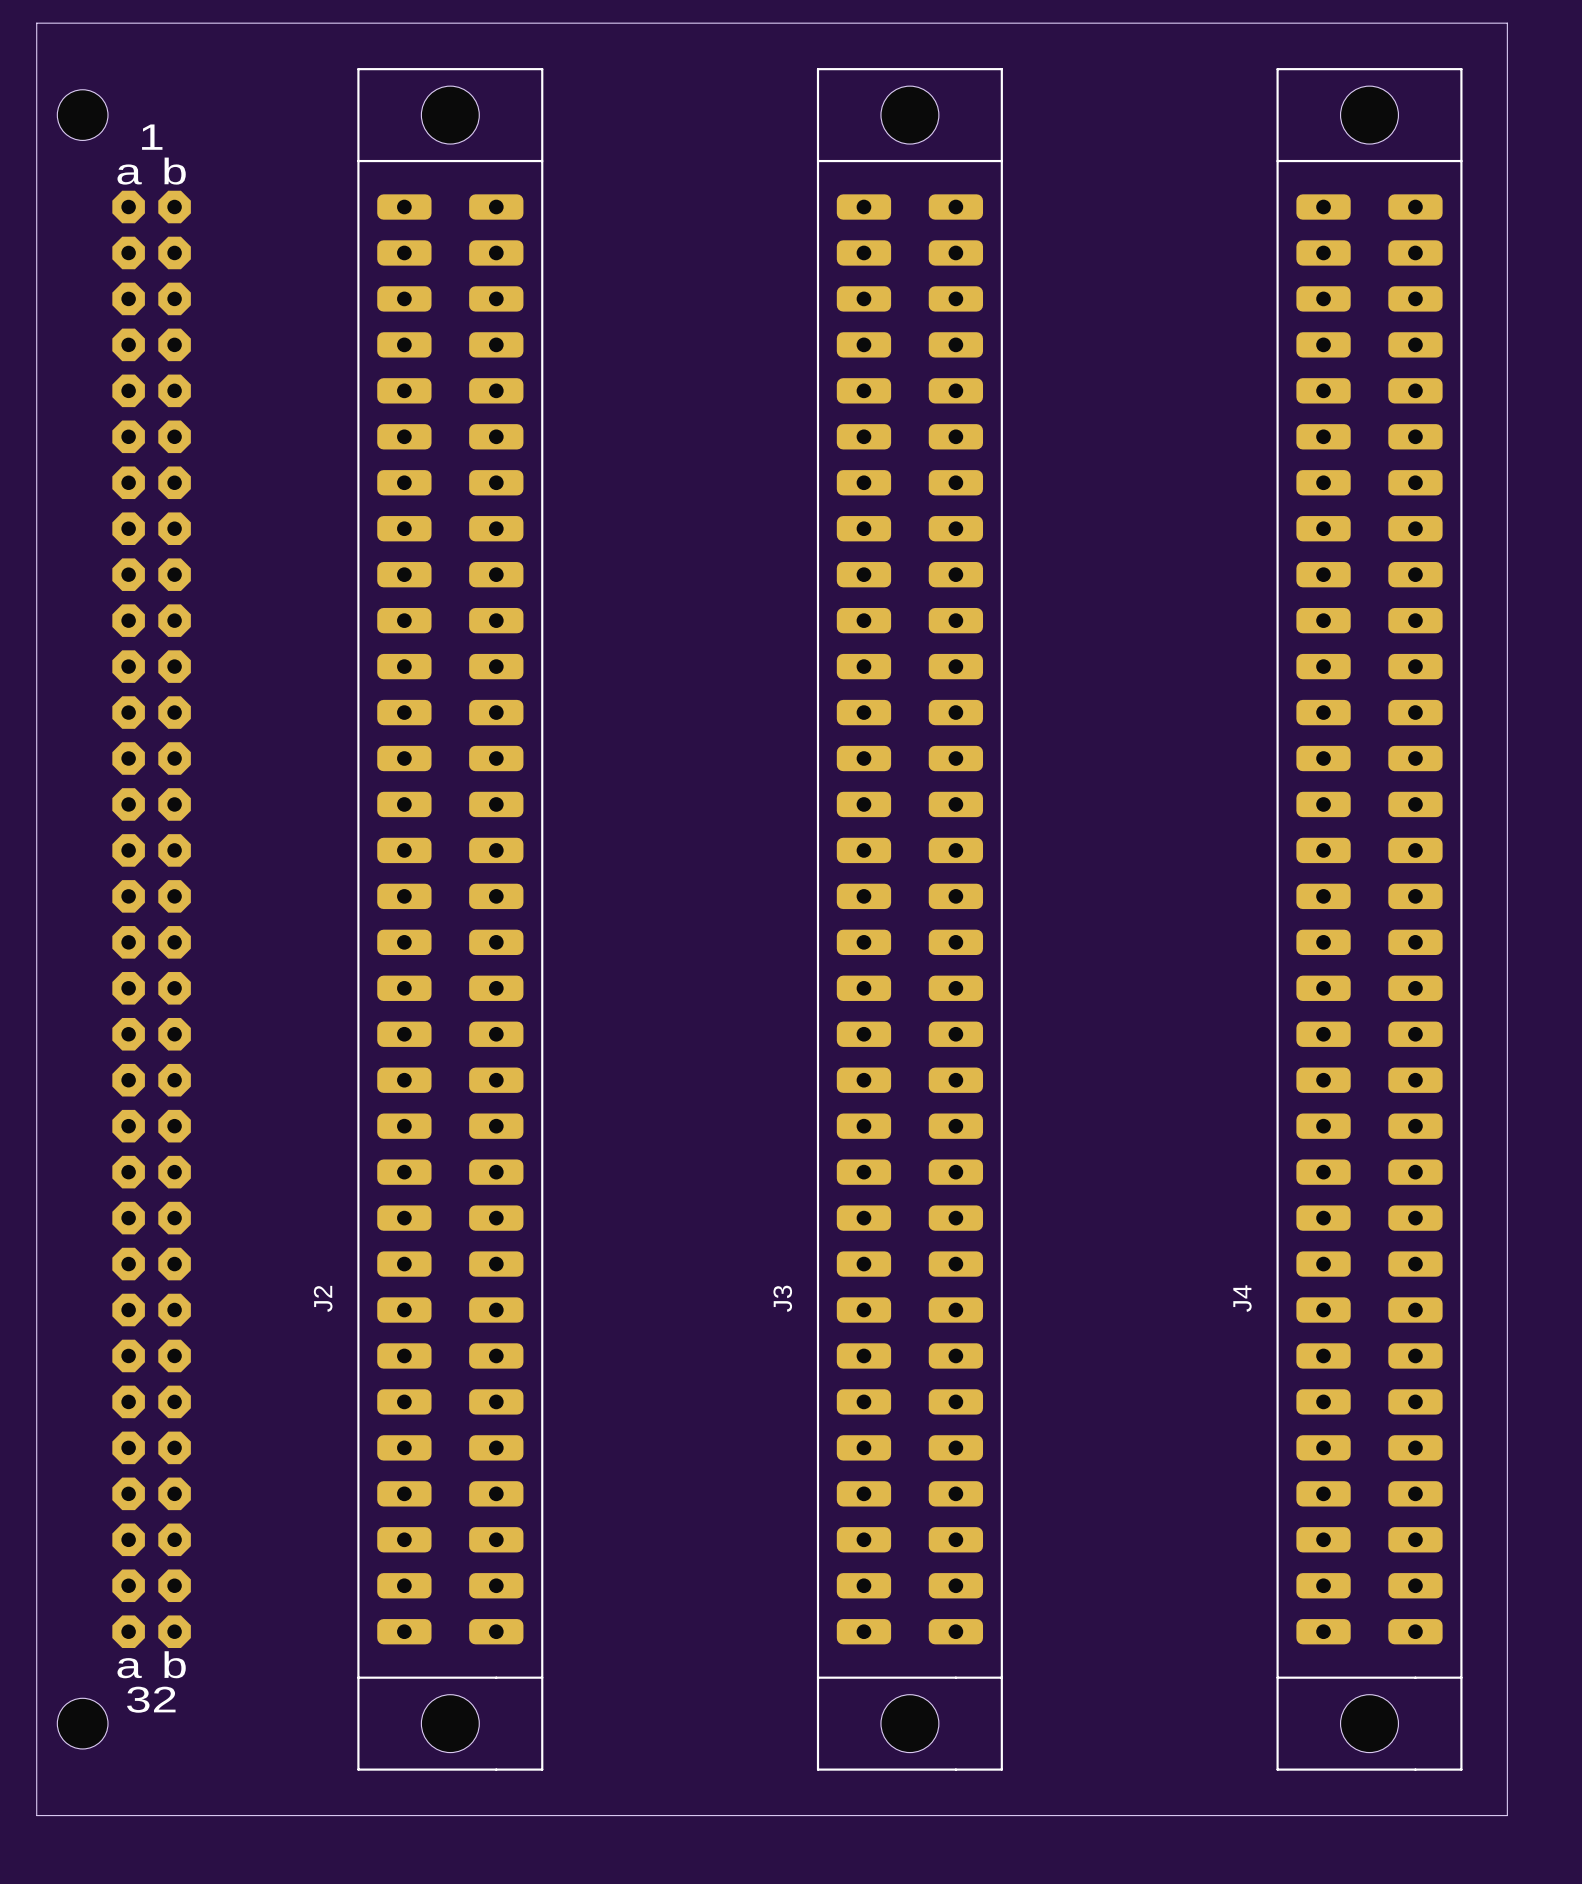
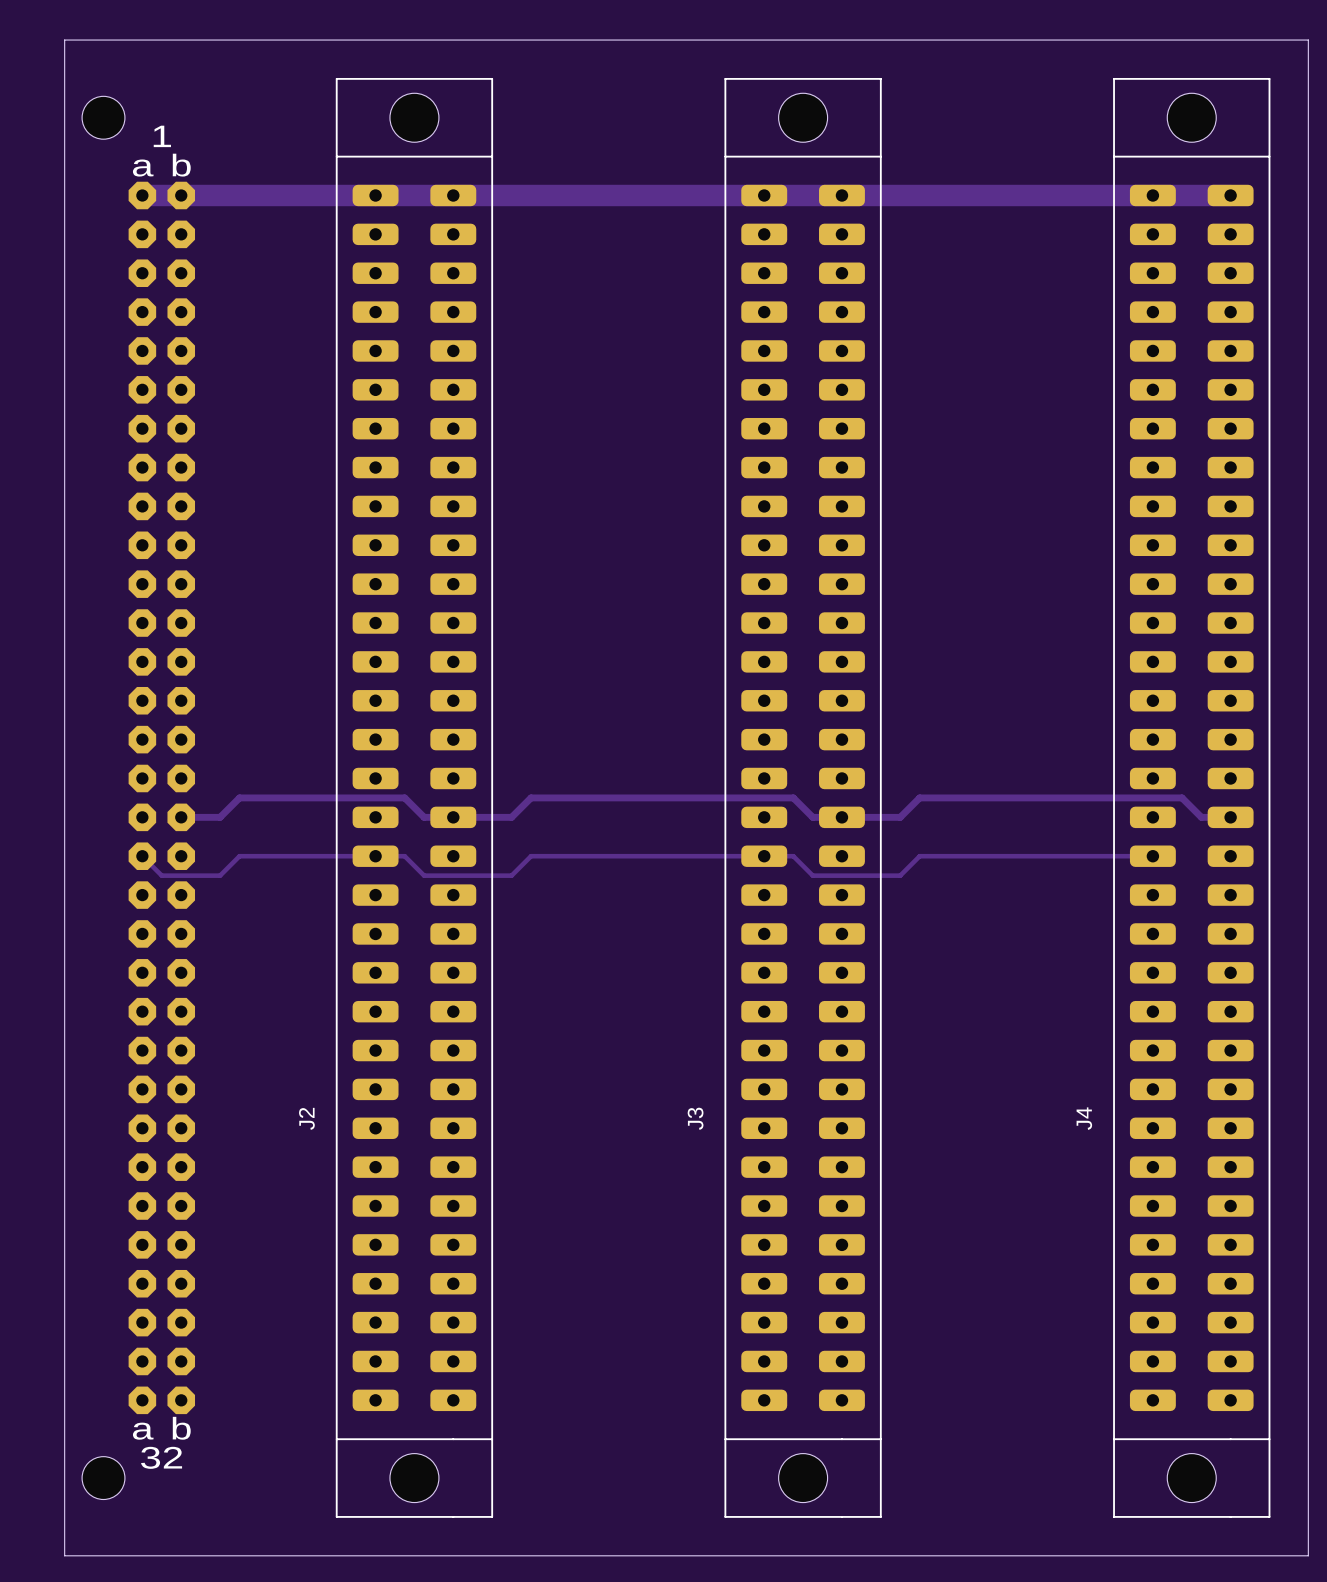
track: none -> (142, 195) (1230, 195)
track: none -> (181, 817) (220, 817) (239, 797) (404, 797) (424, 817) (511, 817) (531, 797) (793, 797) (812, 817) (900, 817) (919, 797) (1182, 797) (1201, 817) (1230, 817)
track: none -> (142, 856) (161, 875) (220, 875) (239, 856) (404, 856) (424, 875) (511, 875) (531, 856) (793, 856) (812, 875) (900, 875) (919, 856) (1152, 856)

